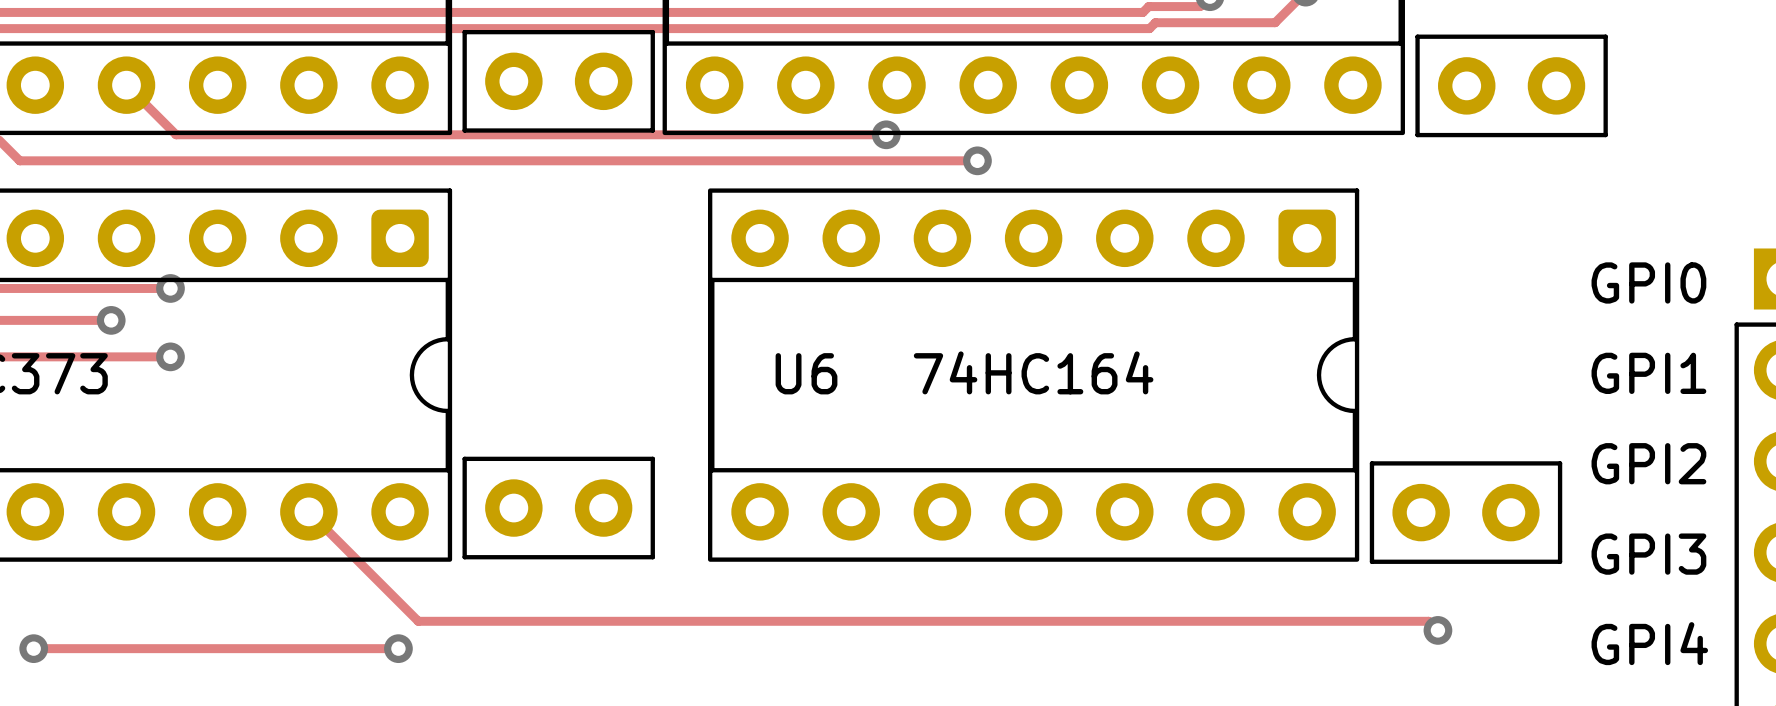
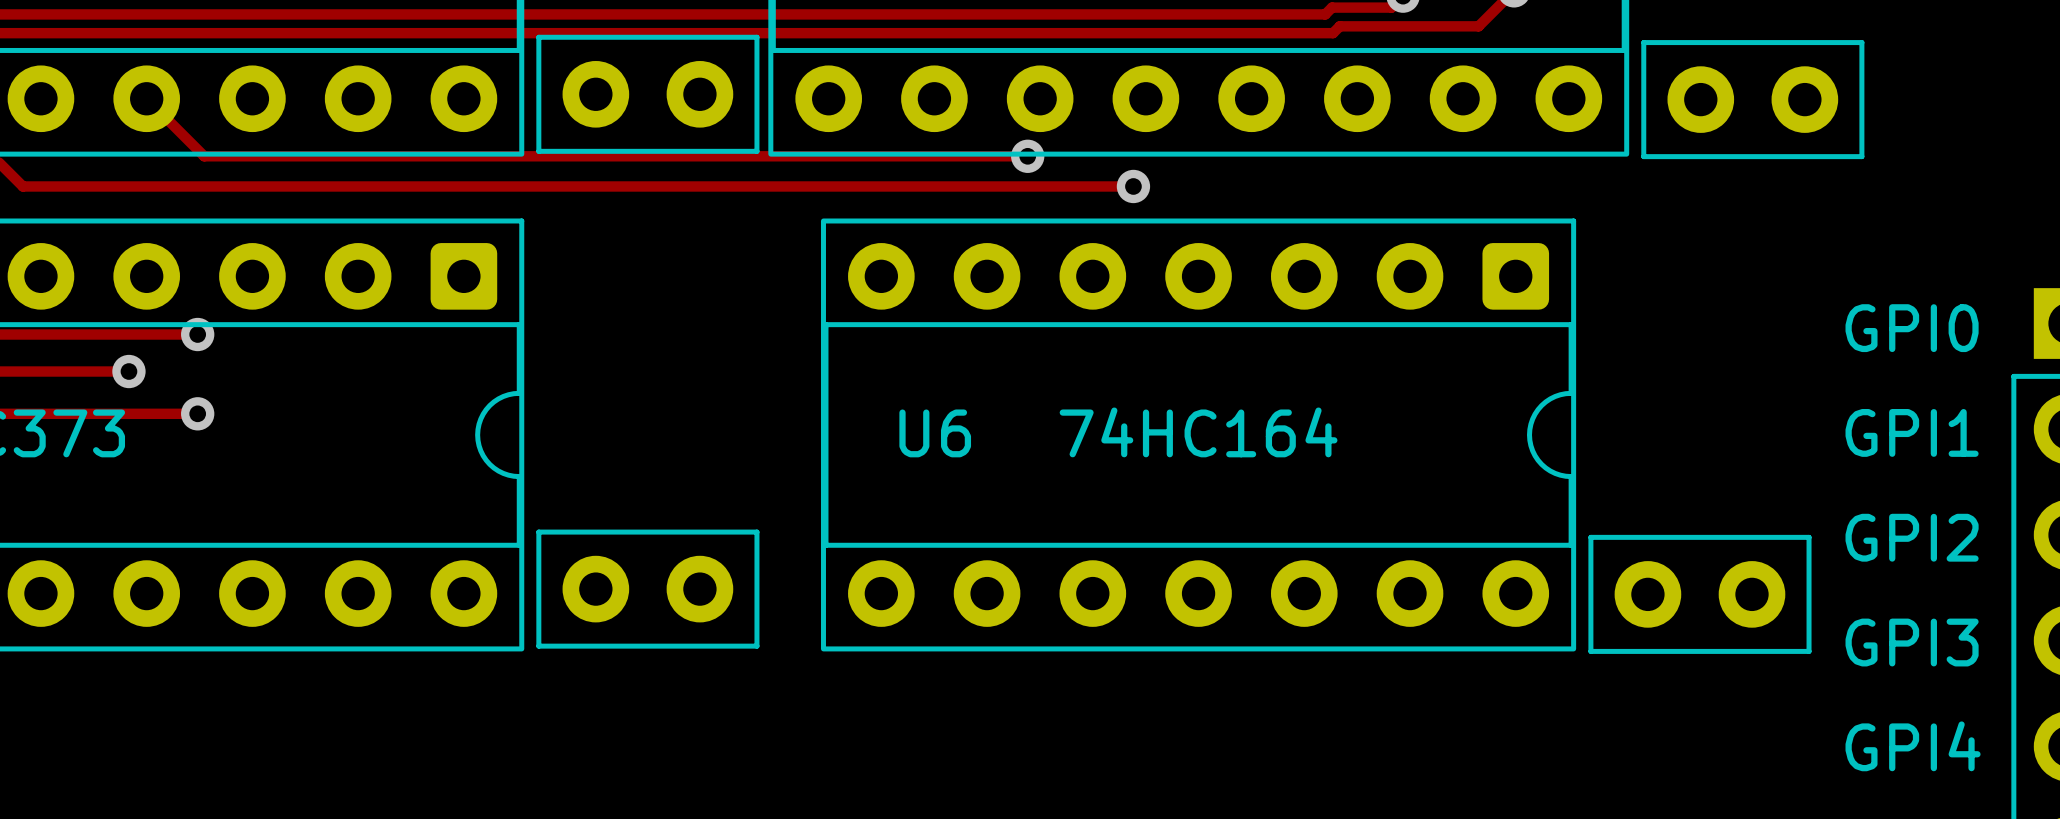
track: (308, 511) (418, 621) (1428, 621) (1437, 630) -> none
via: (1437, 630) -> none
track: (33, 648) (398, 648) -> none
via: (33, 648) -> none
via: (398, 648) -> none

